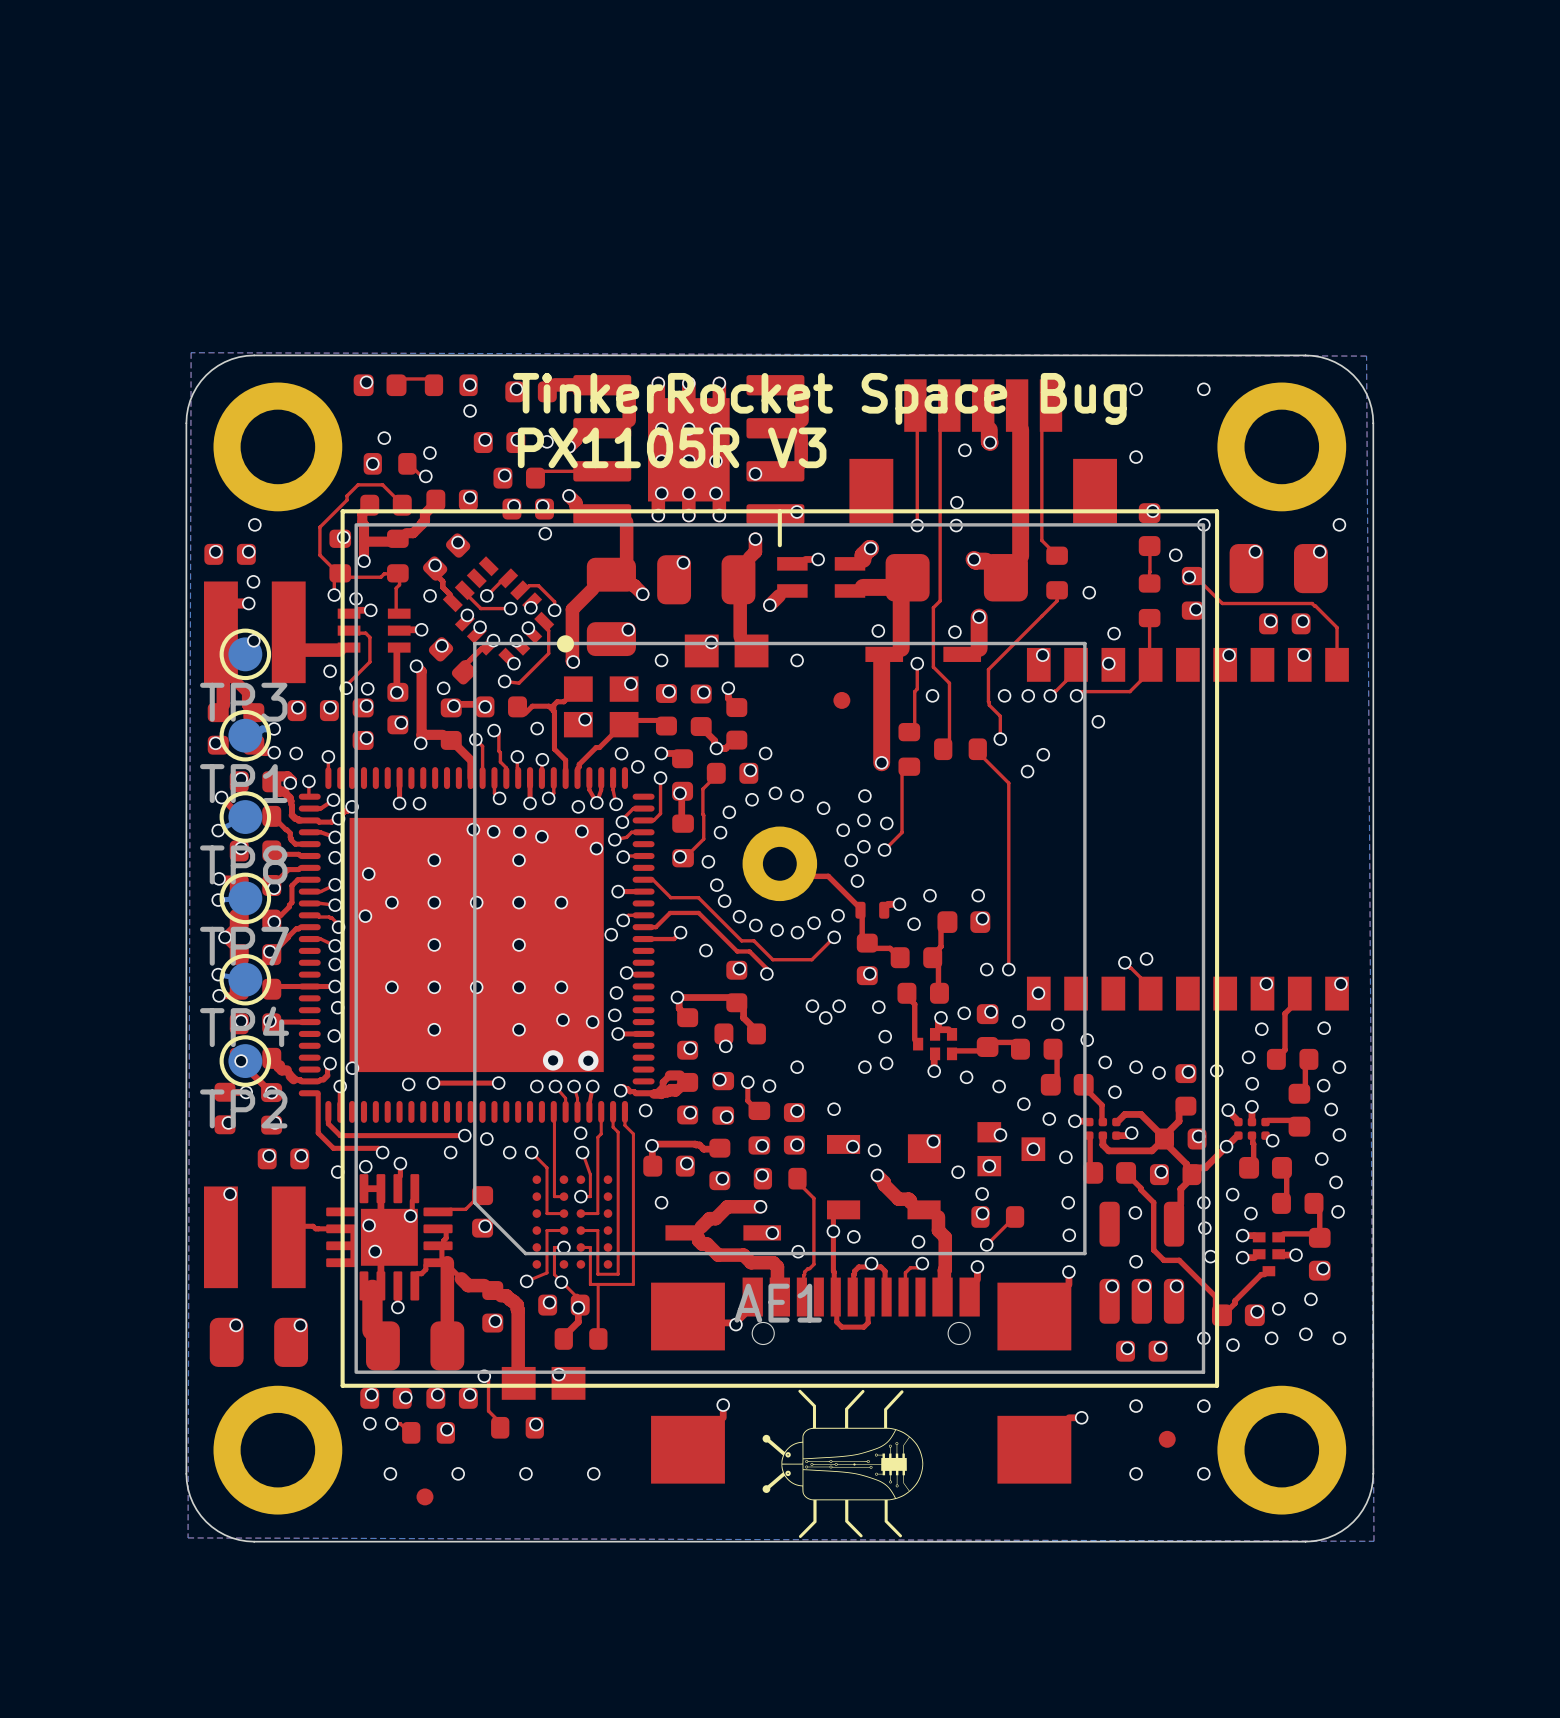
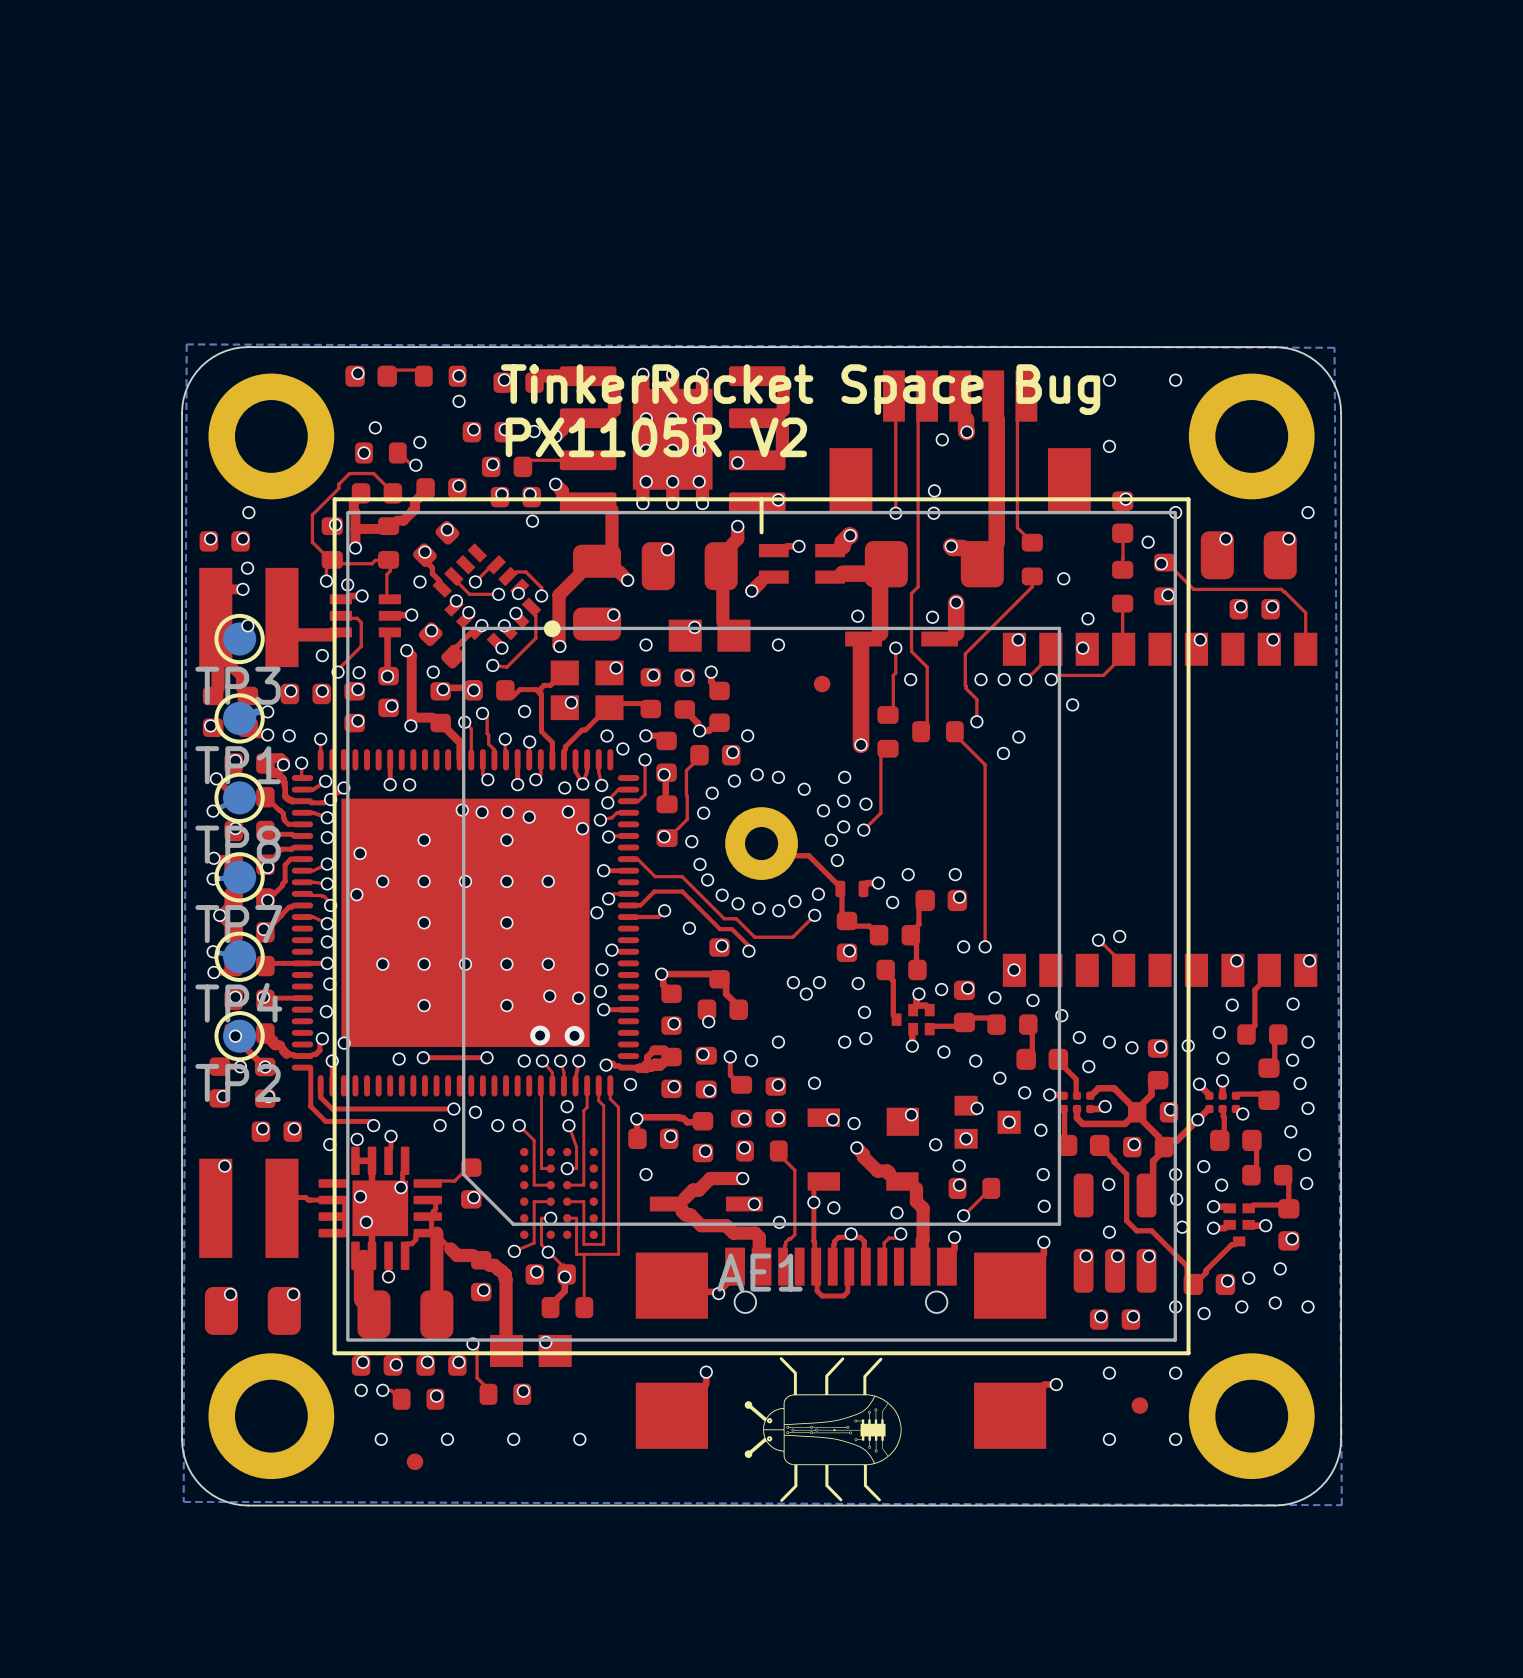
text: PX1105R V3 (672, 447) -> PX1105R V2 (656, 437)

